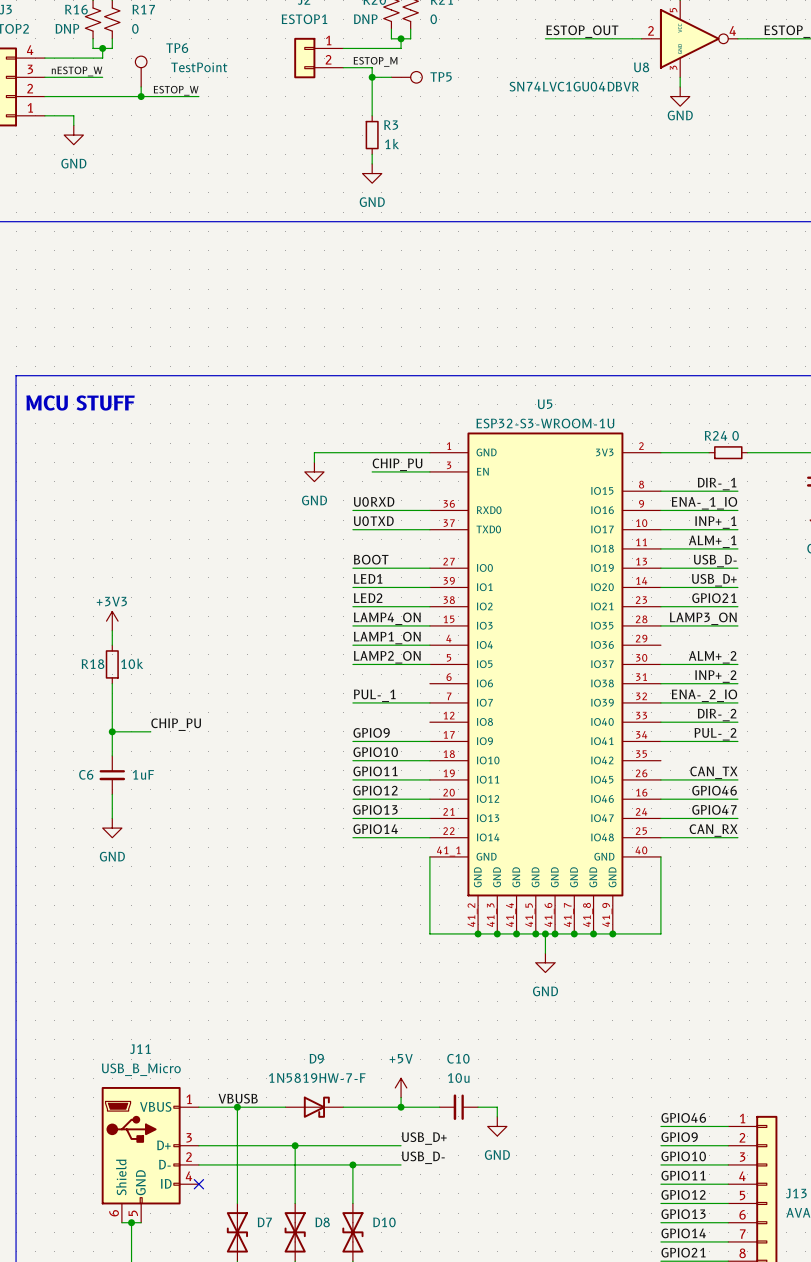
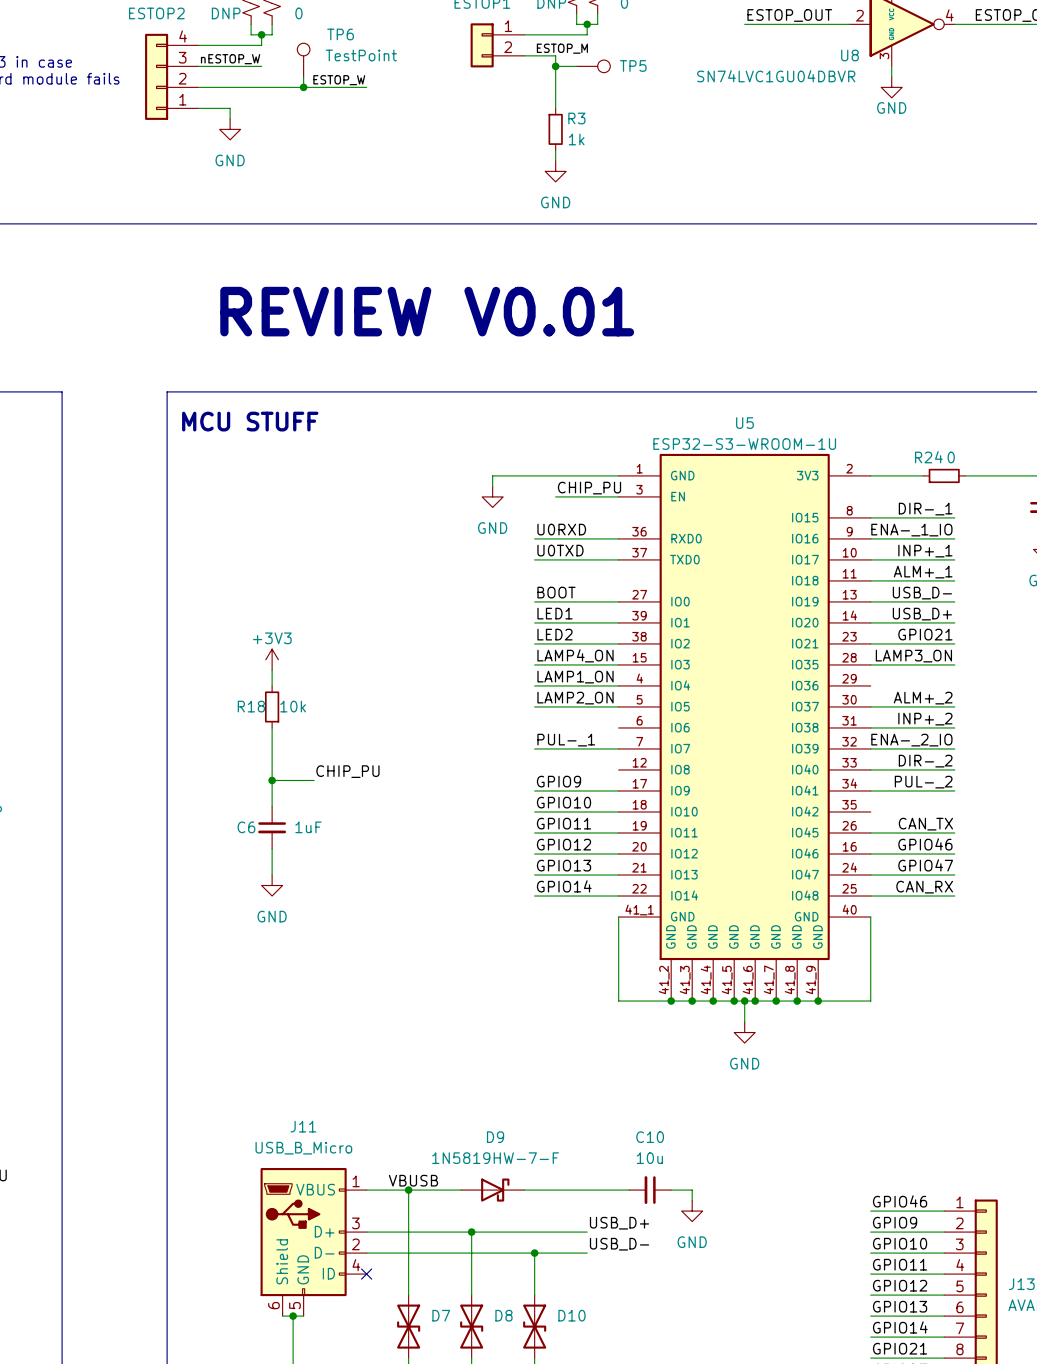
text: none -> REVIEW V0.01 (427, 311)
power symbol: +5V (401, 1087) -> none
wire: (401, 1097) (401, 1107) -> none
junction: (401, 1107) -> none

